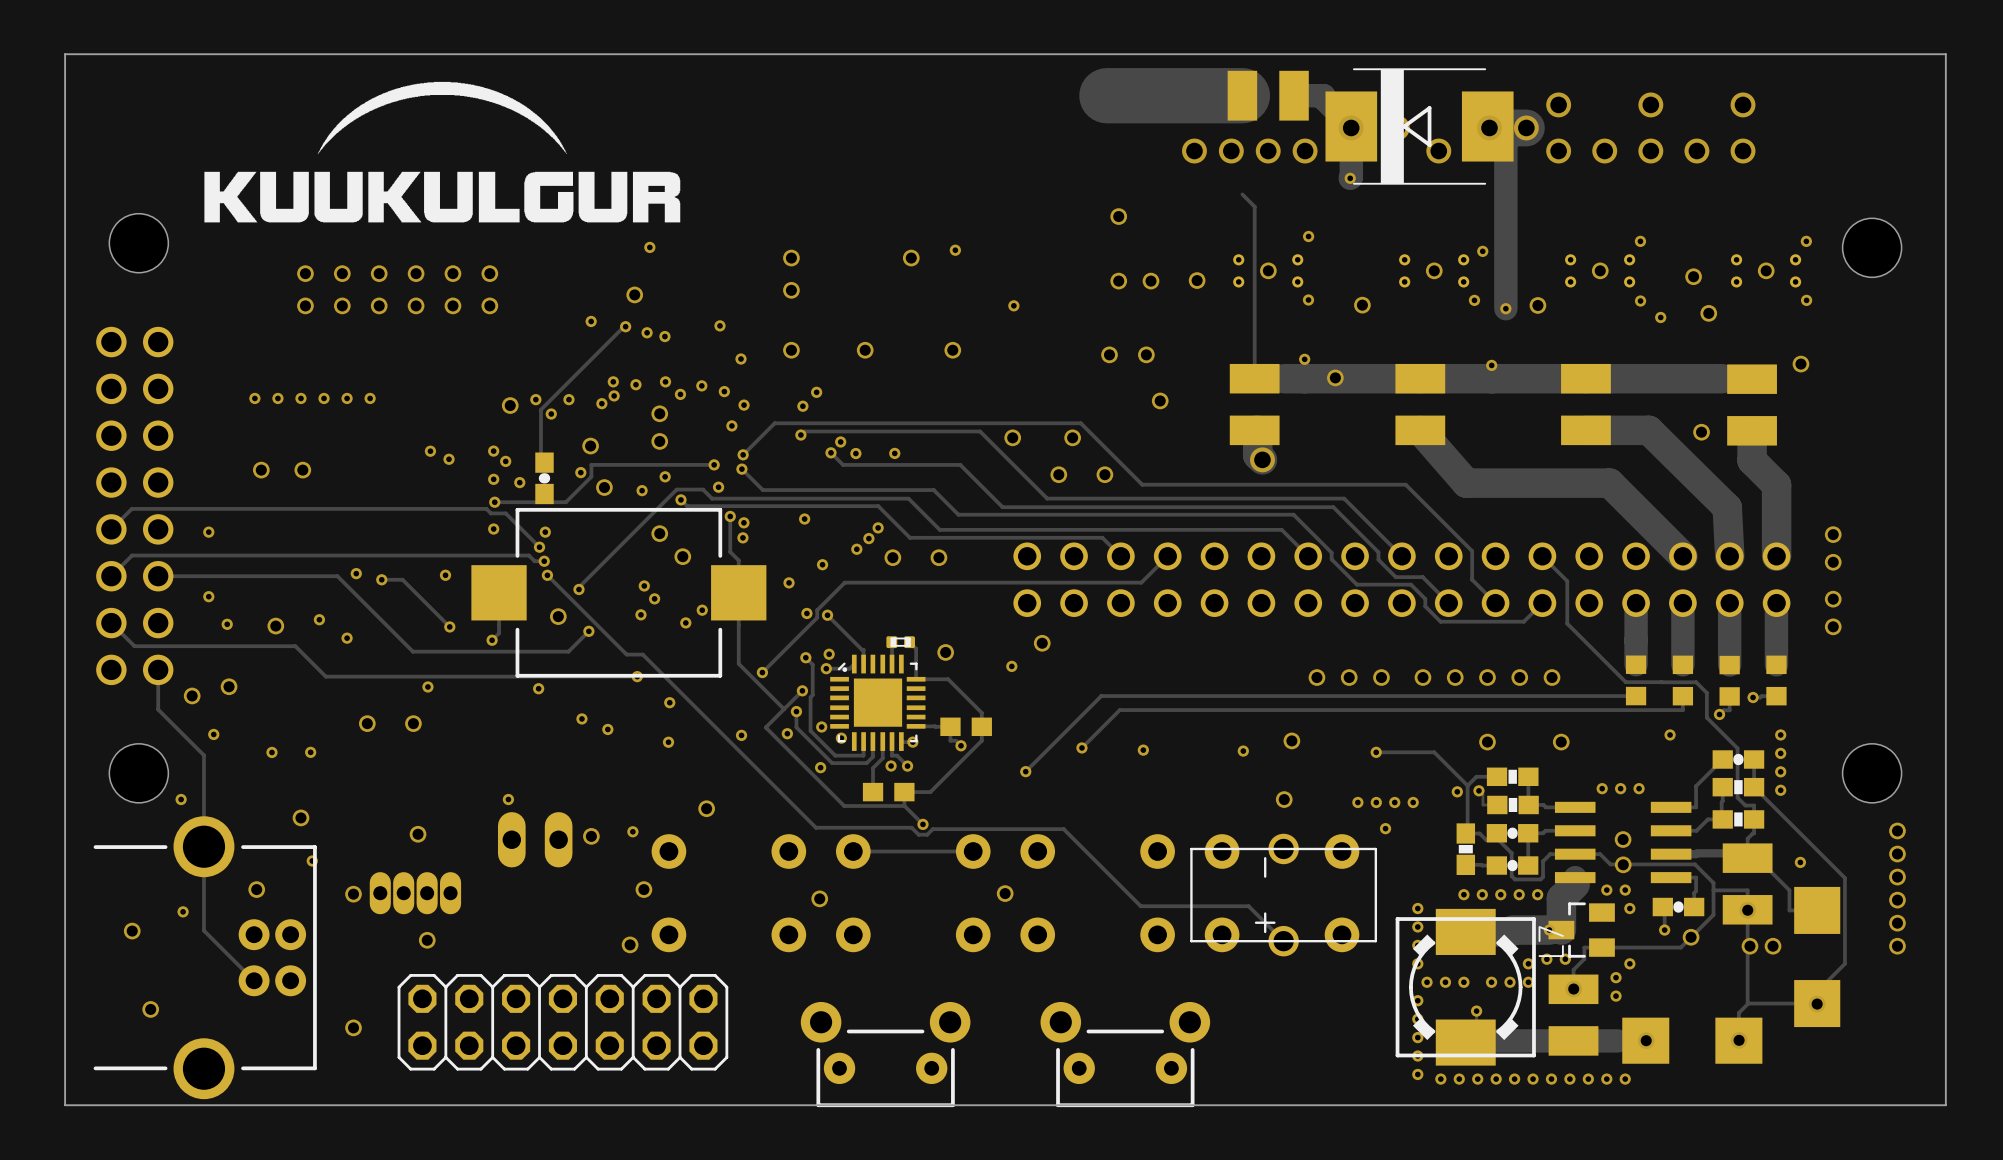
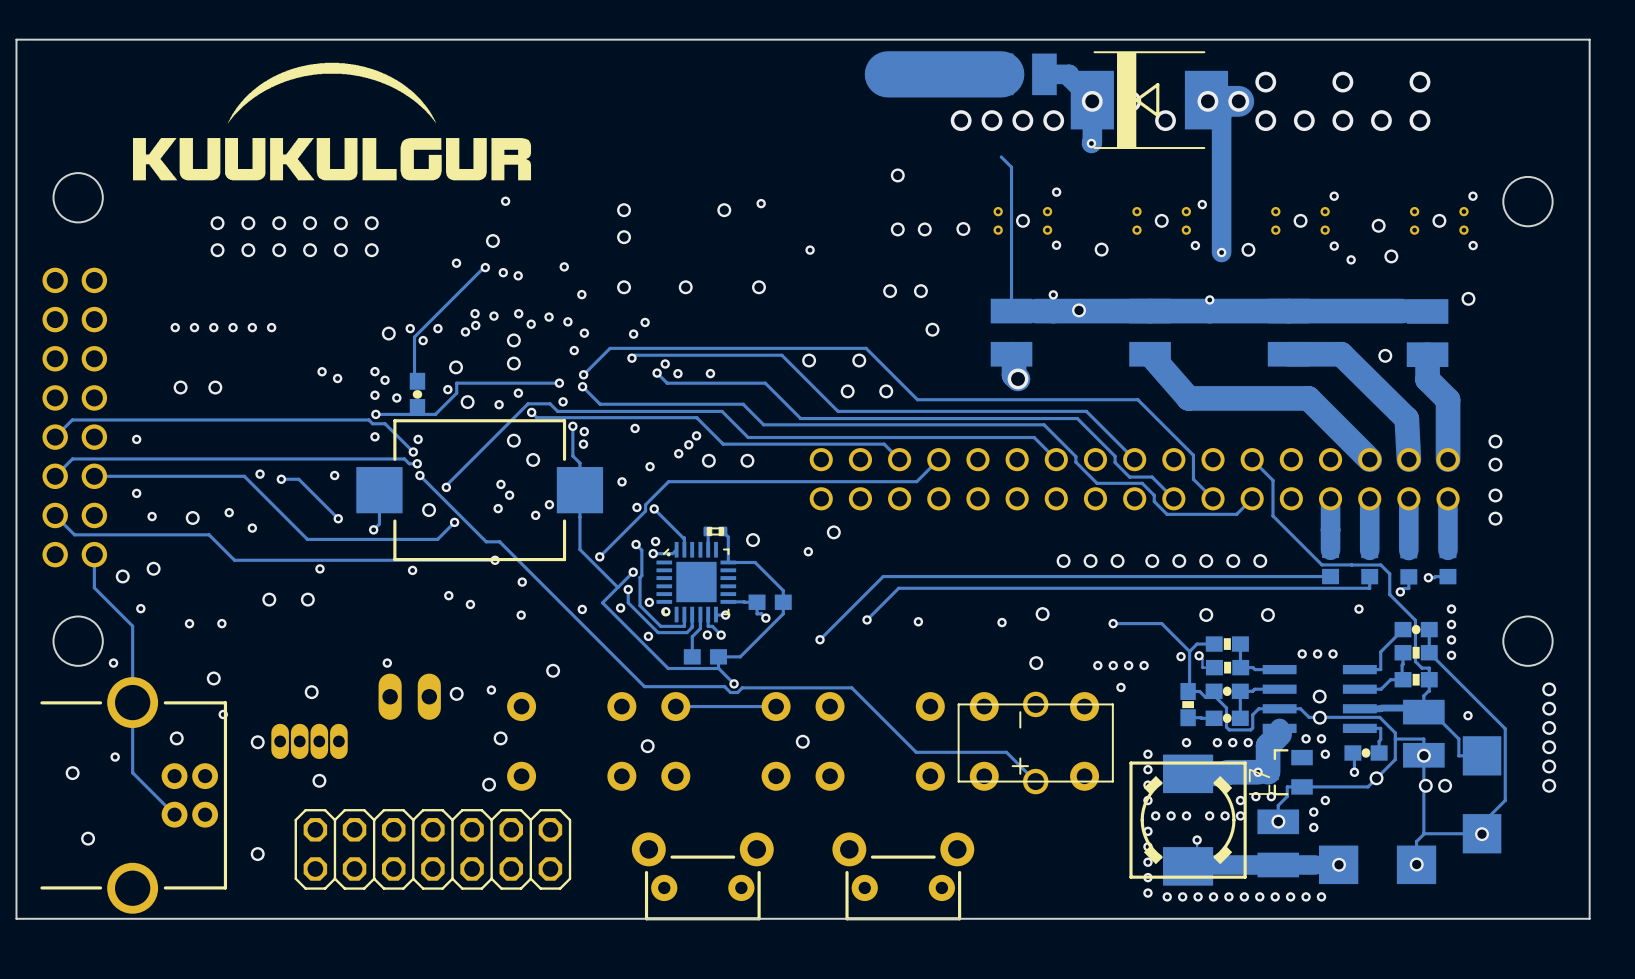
via: (1482, 894) -> none

